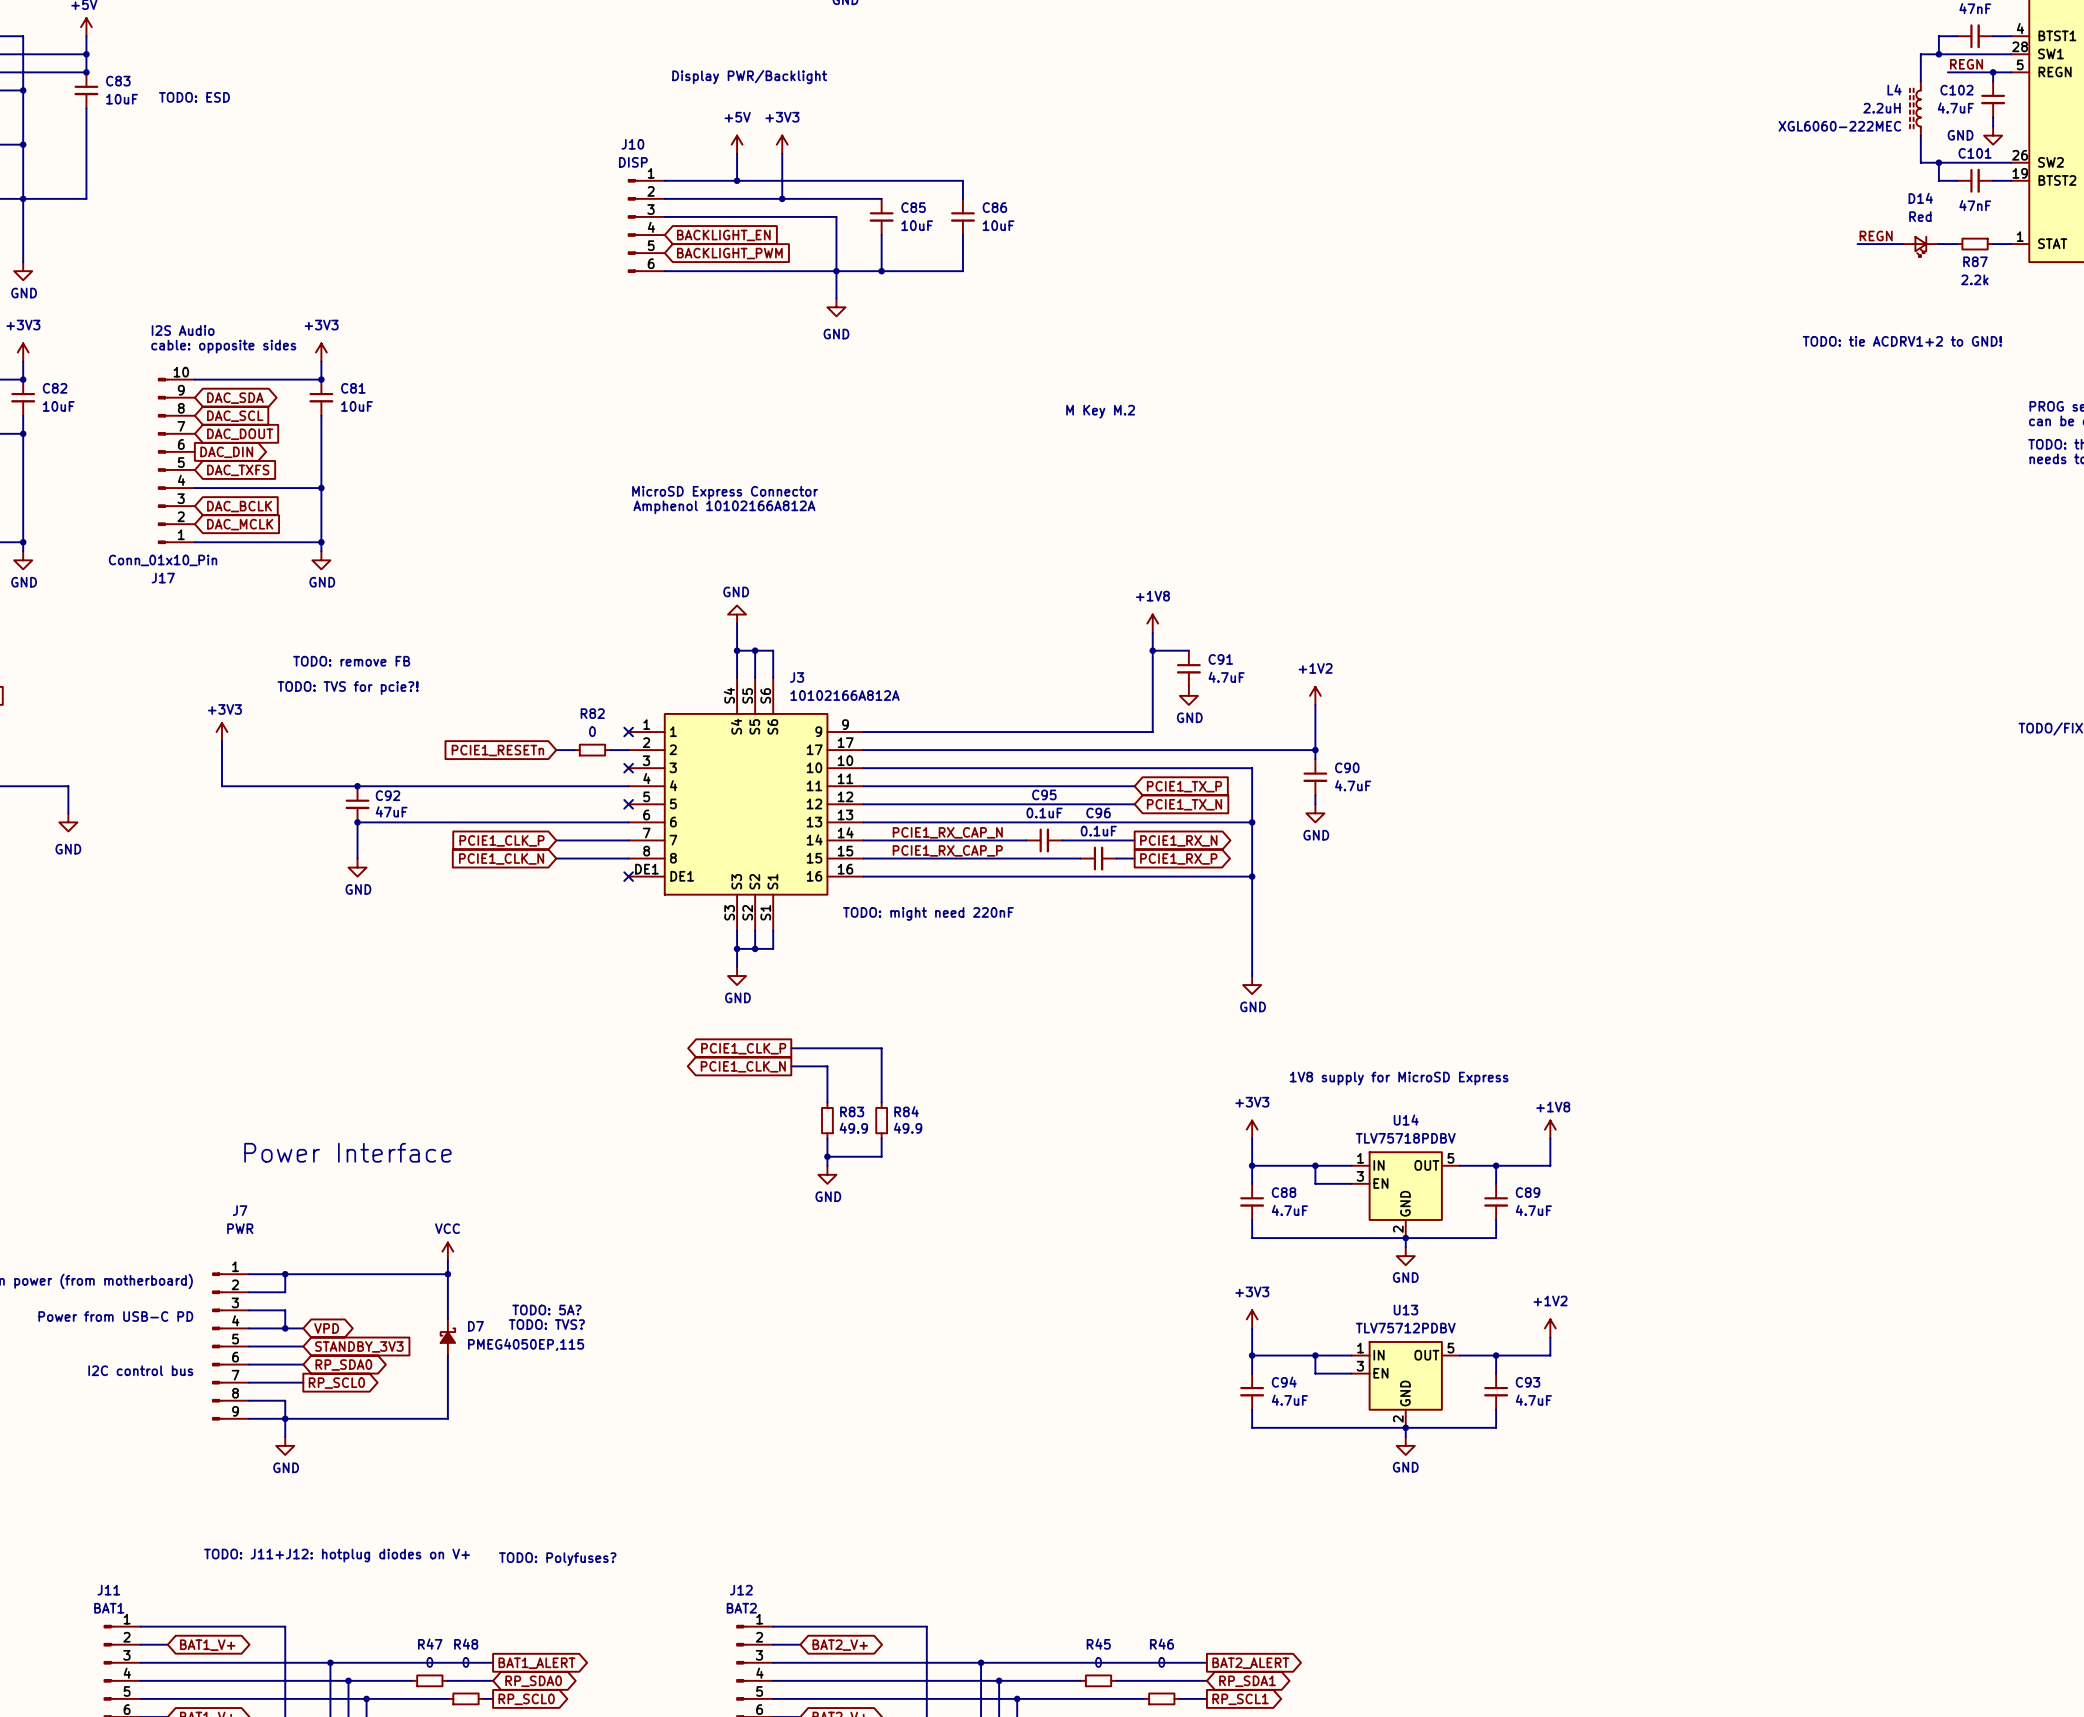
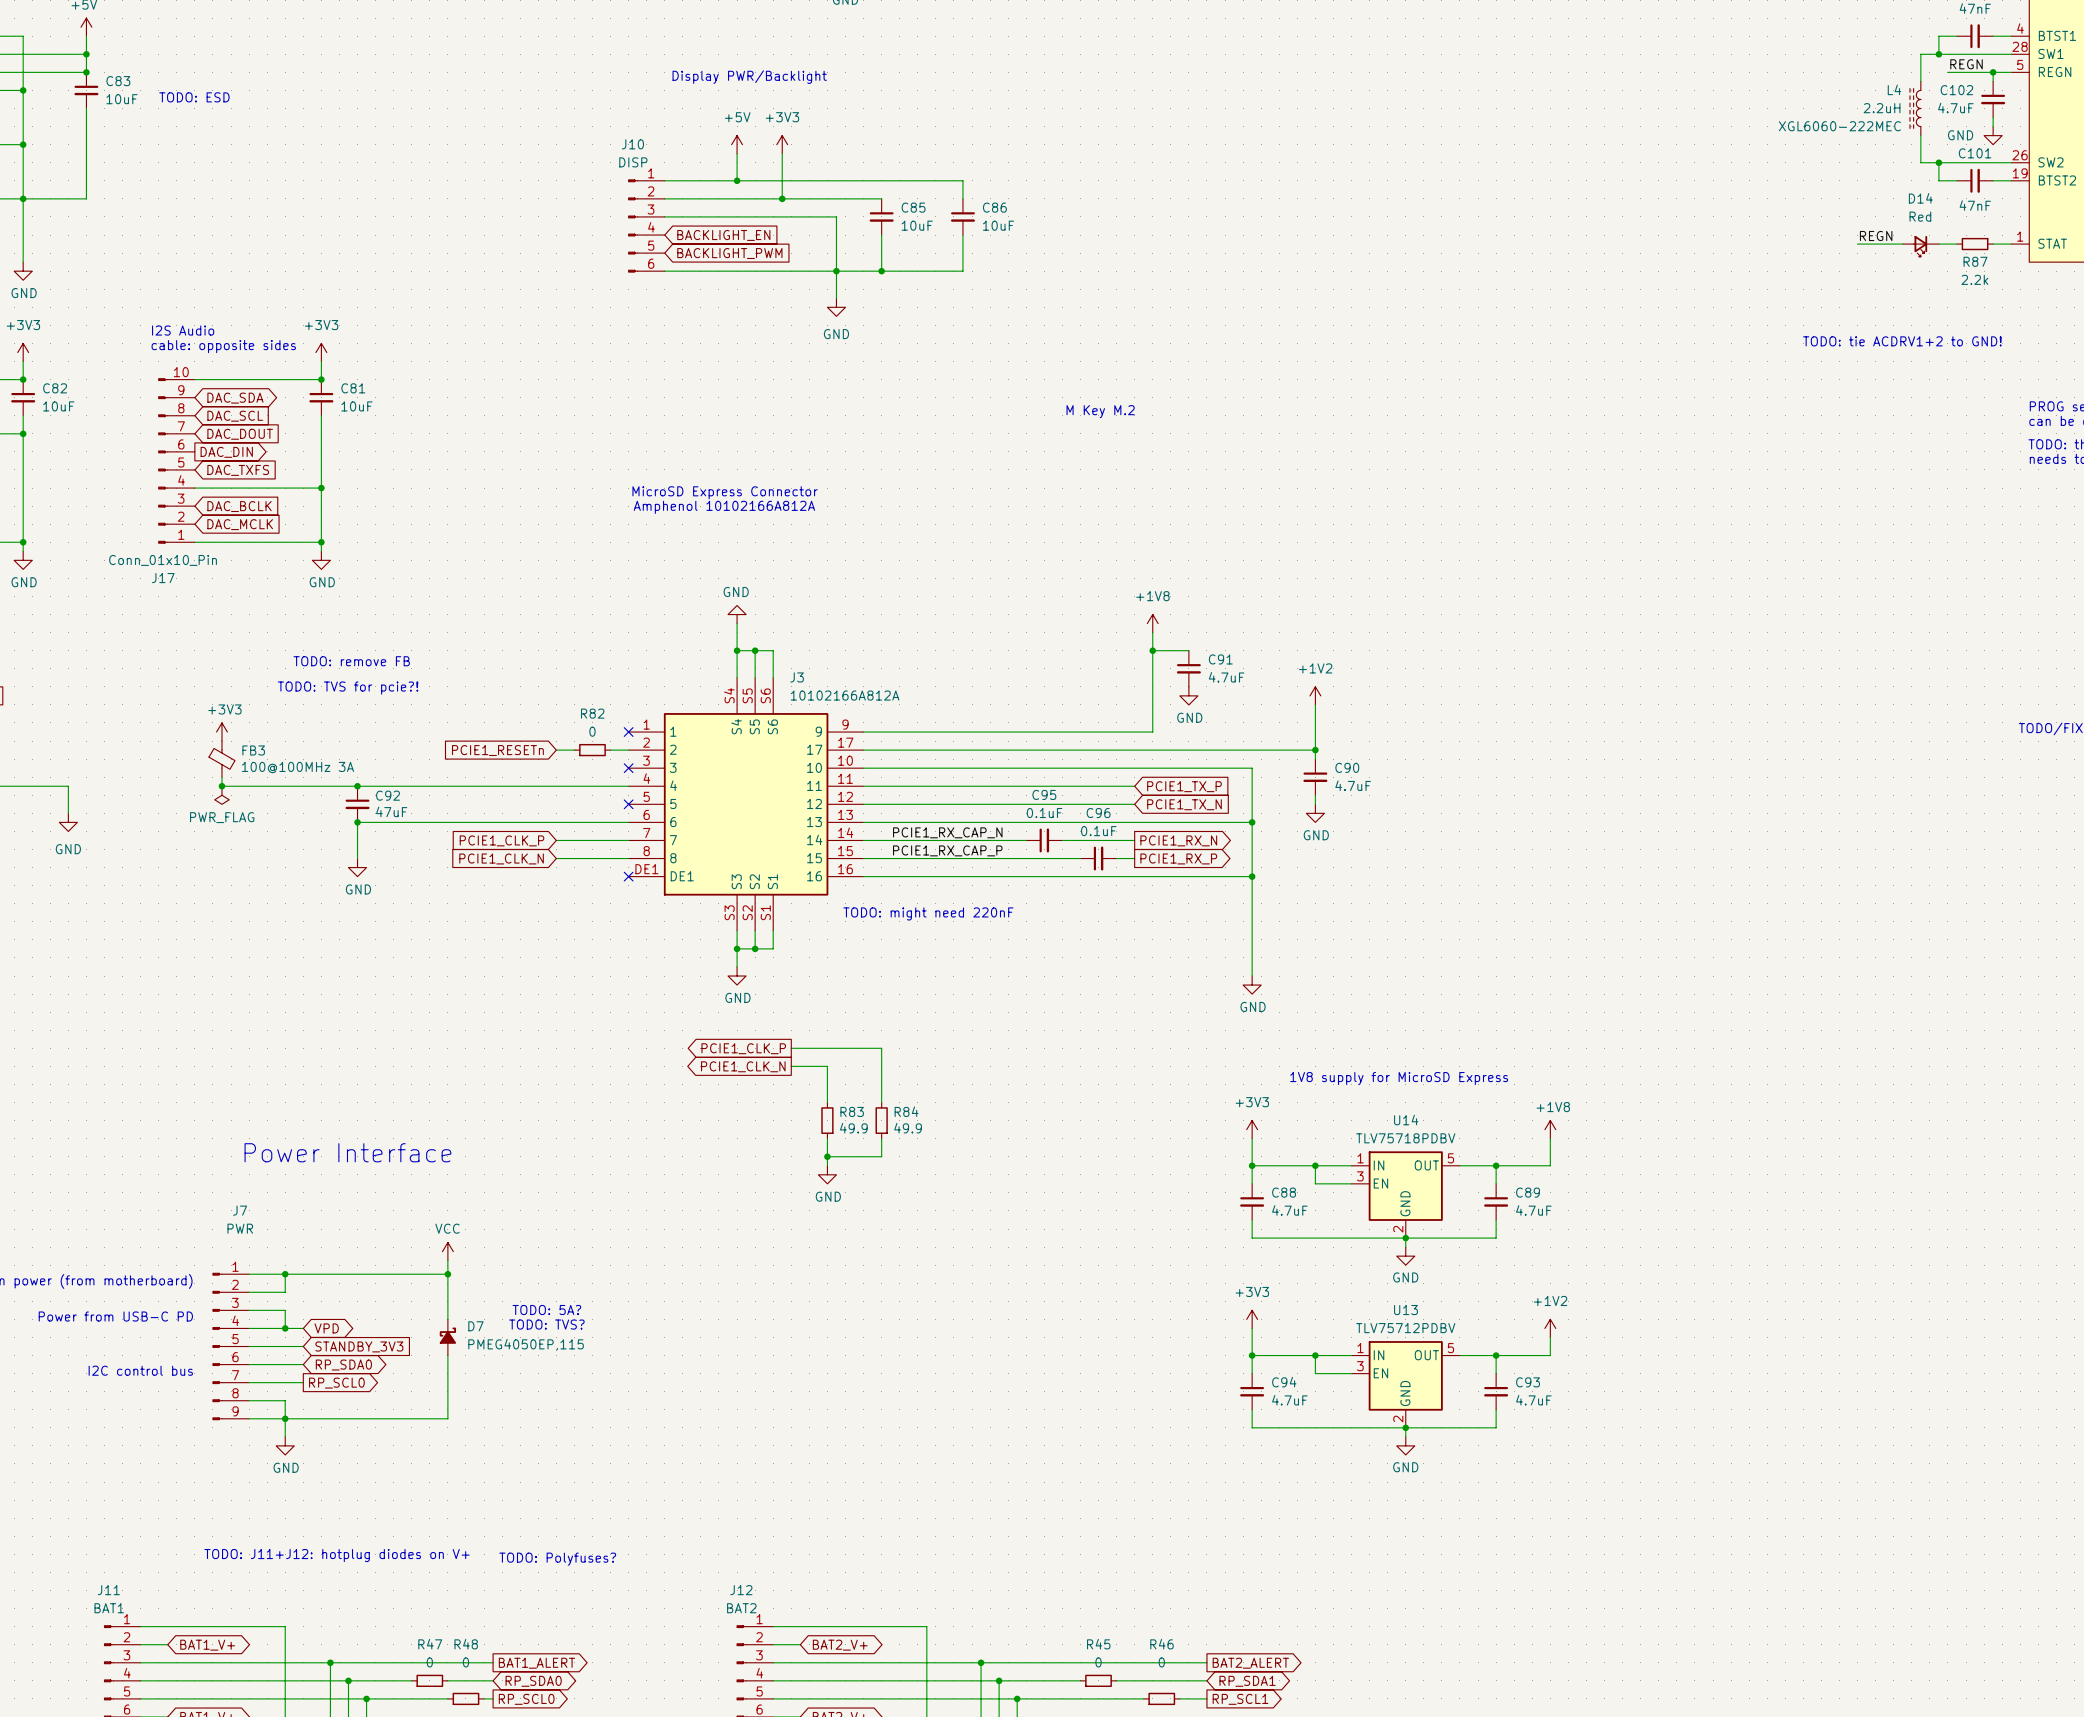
FB3: none -> 100@100MHz 3A (221, 759)
junction: none -> (221, 786)
power symbol: none -> PWR_FLAG (221, 795)

